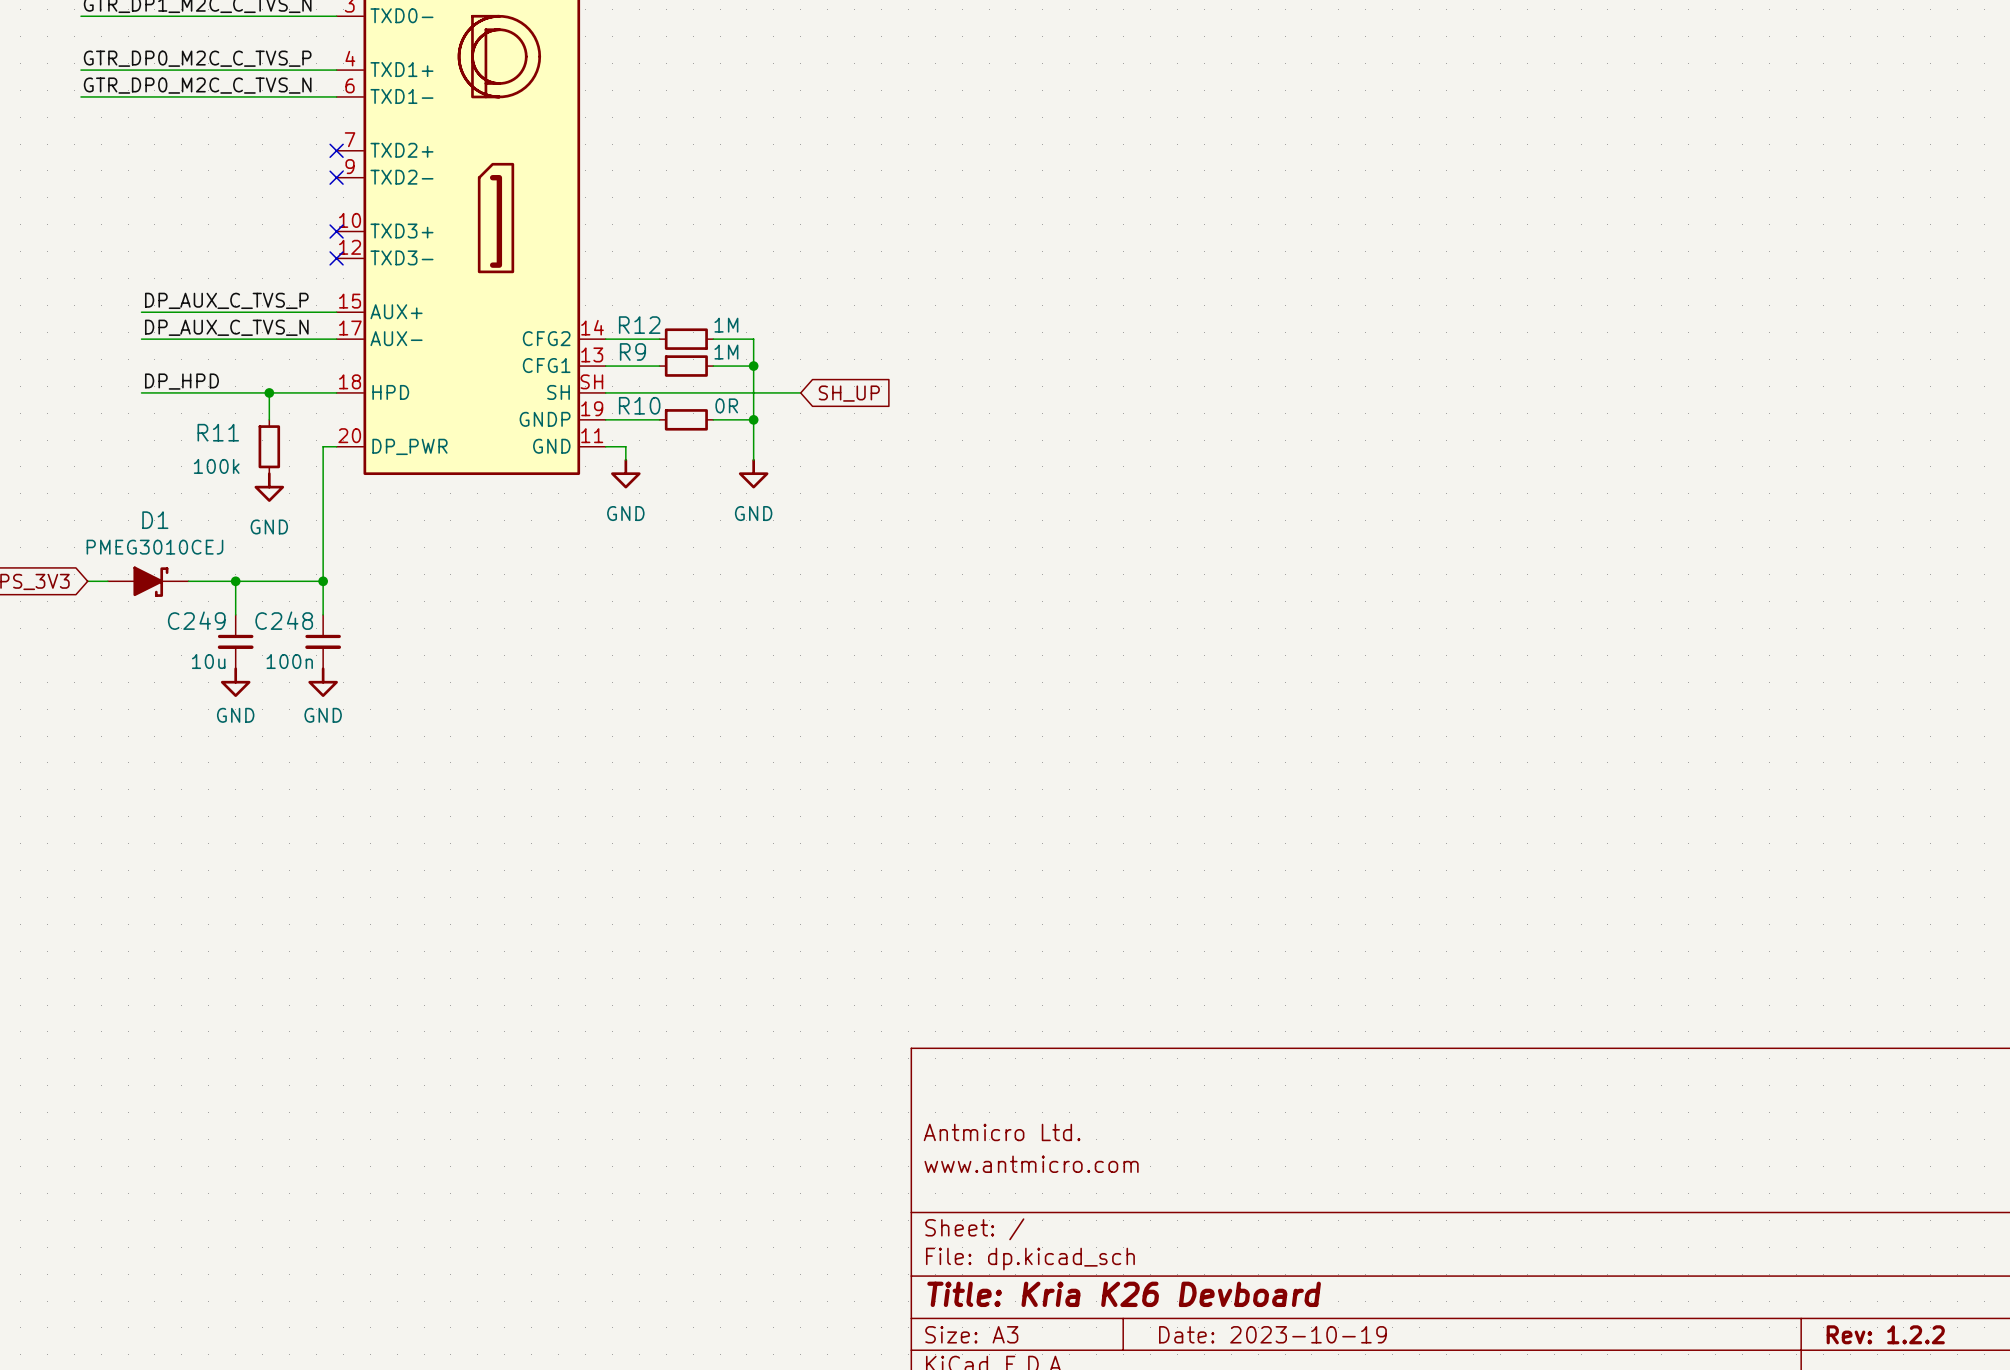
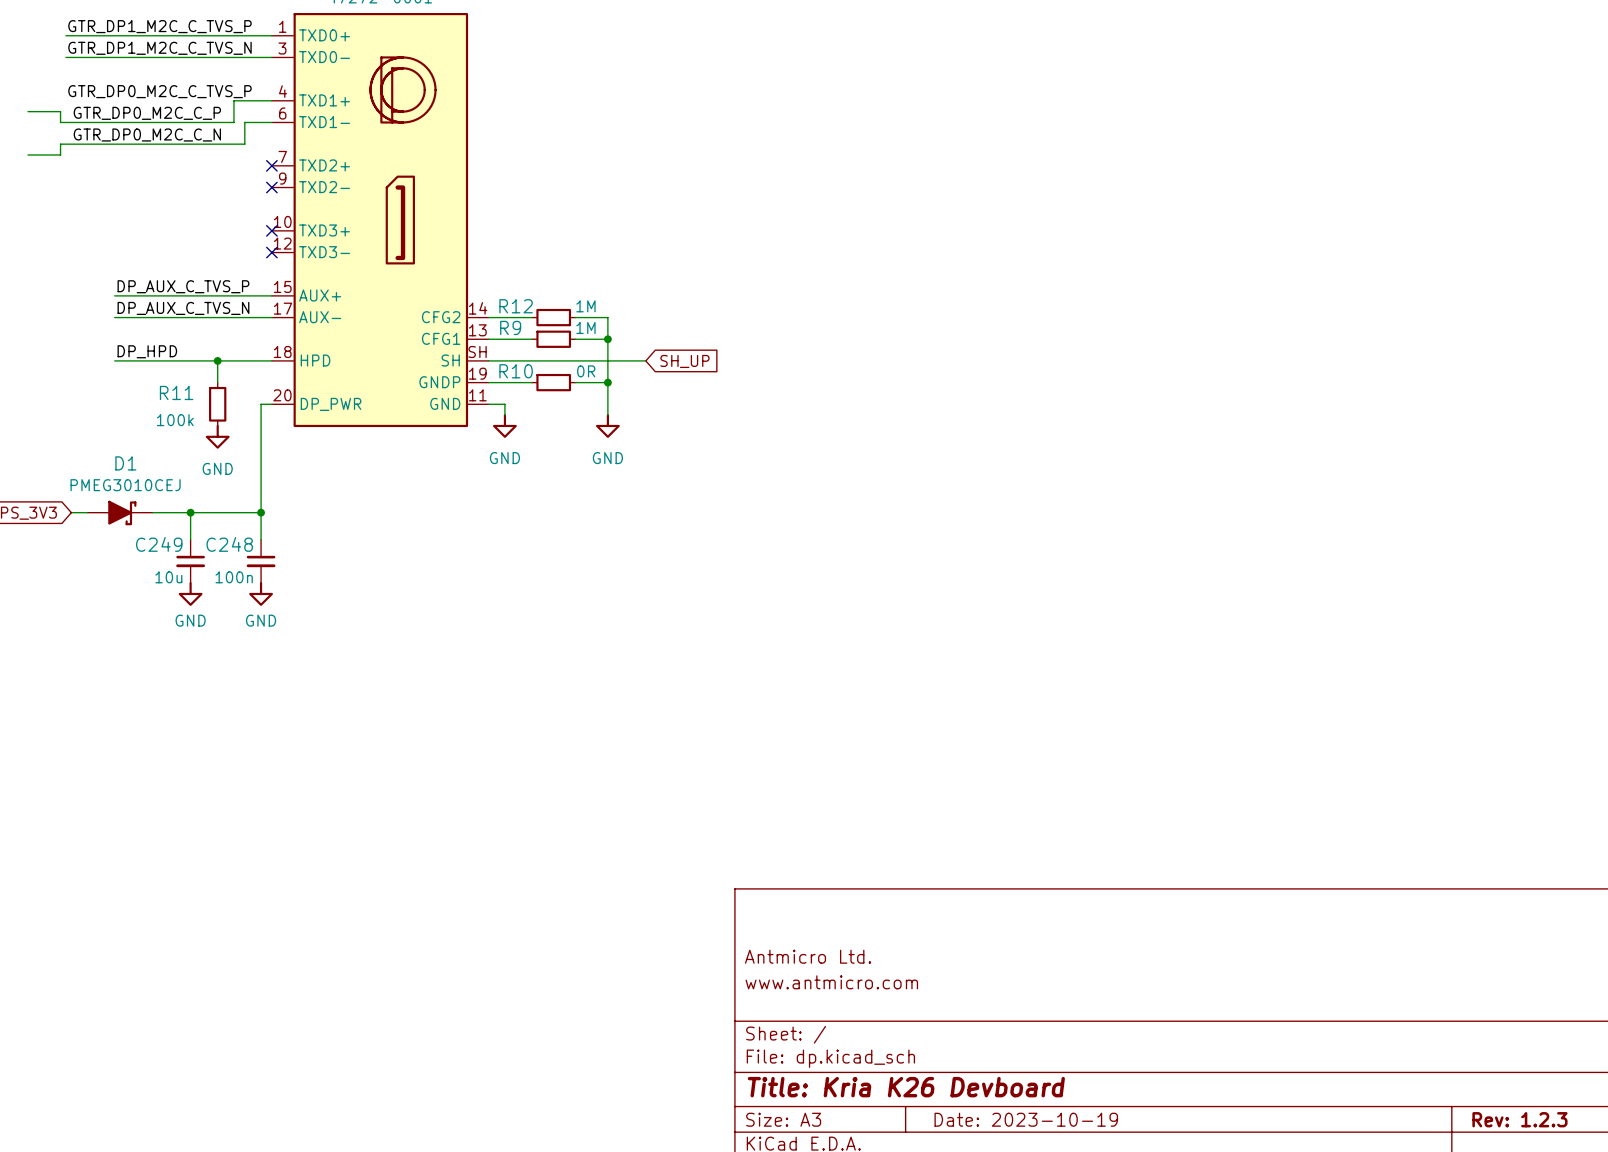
wire: (80, 70) (289, 70) -> none
wire: none -> (28, 111) (60, 111) (60, 122) (65, 122)
label: GTR_DP0_M2C_C_TVS_N (197, 85) -> GTR_DP0_M2C_C_P (147, 113)
wire: (289, 96) (302, 96) -> (233, 122) (233, 100)
wire: none -> (244, 122) (244, 144) (60, 144) (60, 155) (28, 155)
label: none -> GTR_DP0_M2C_C_N (147, 135)
title block: Rev: 1.2.2 (1885, 1334) -> Rev: 1.2.3 (1519, 1119)

